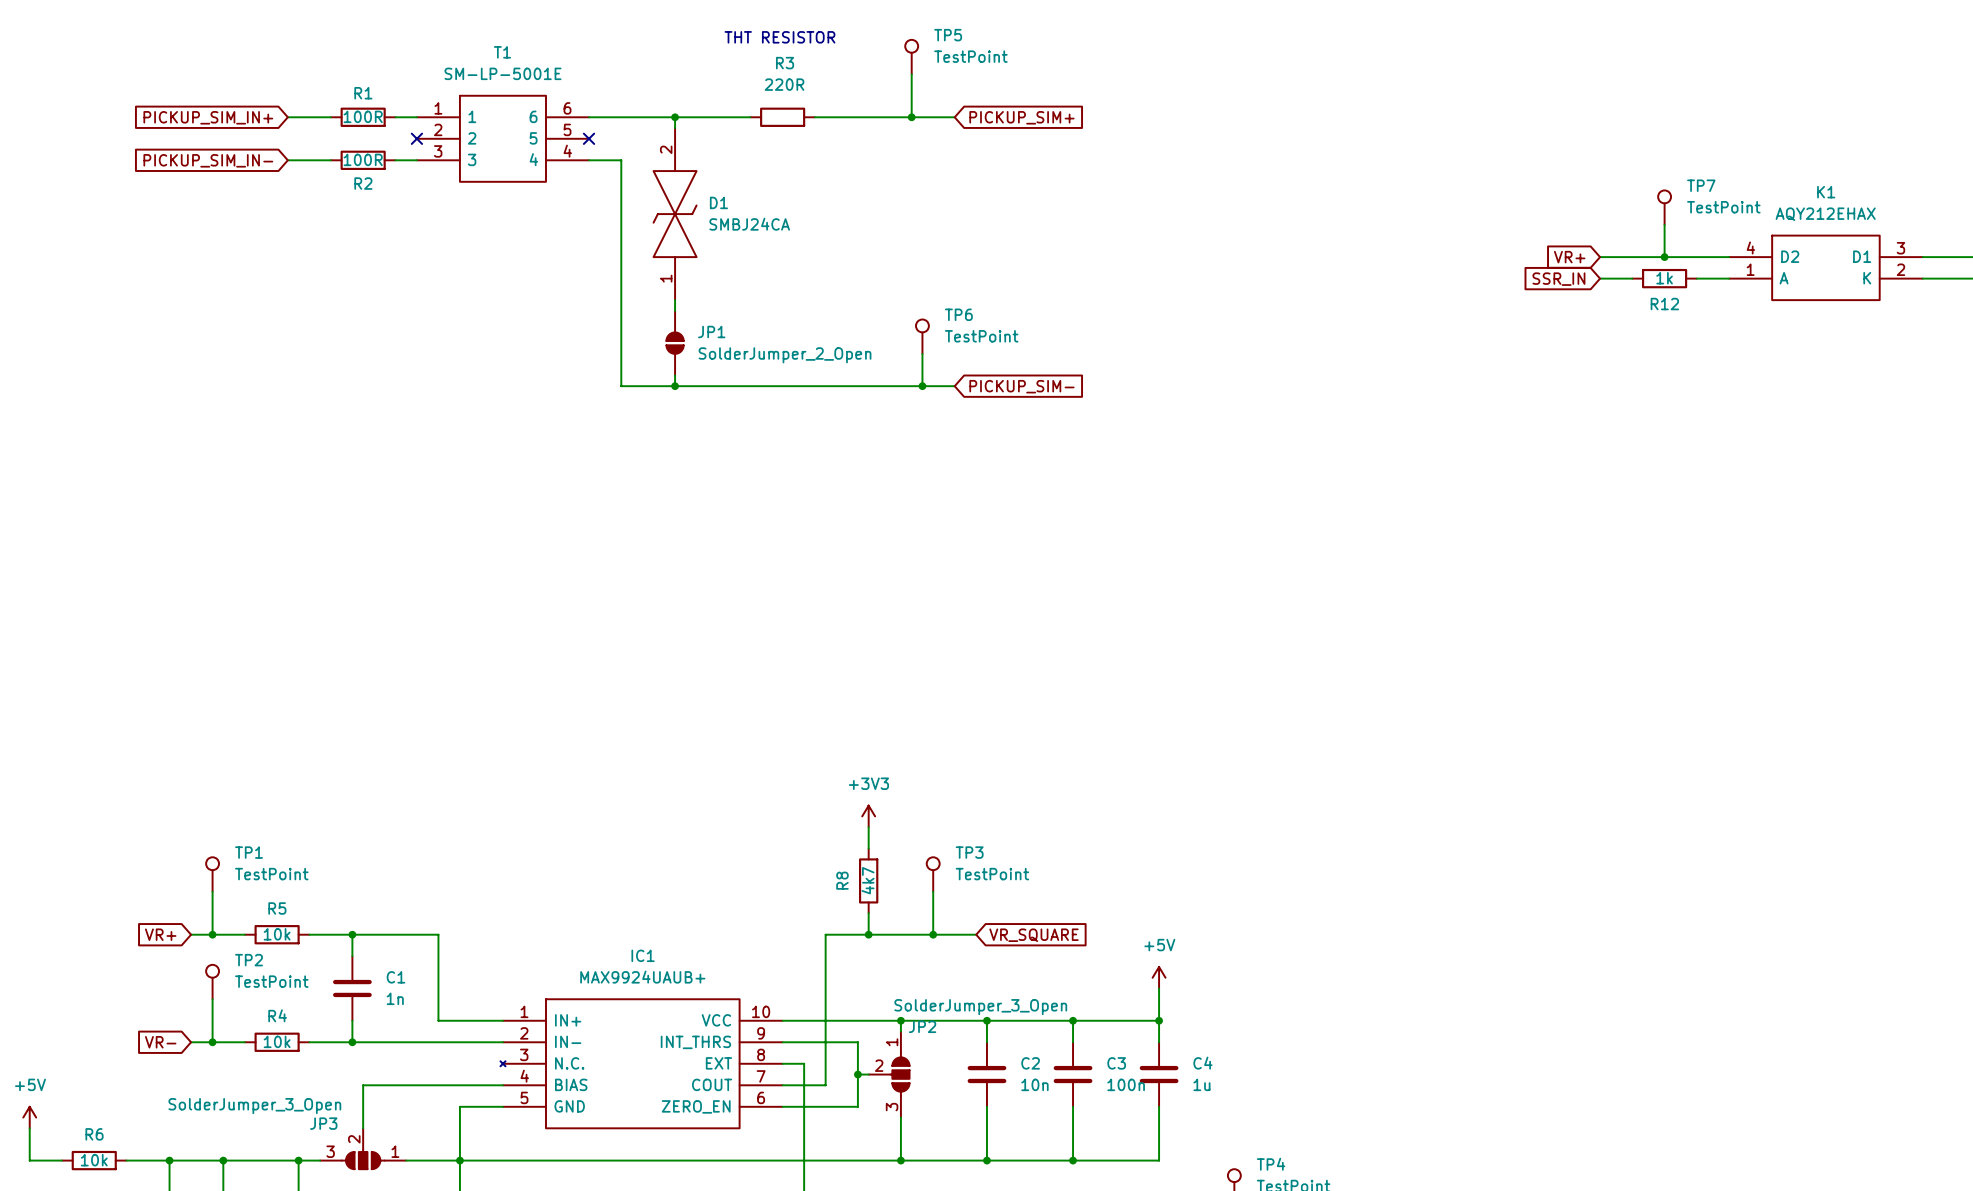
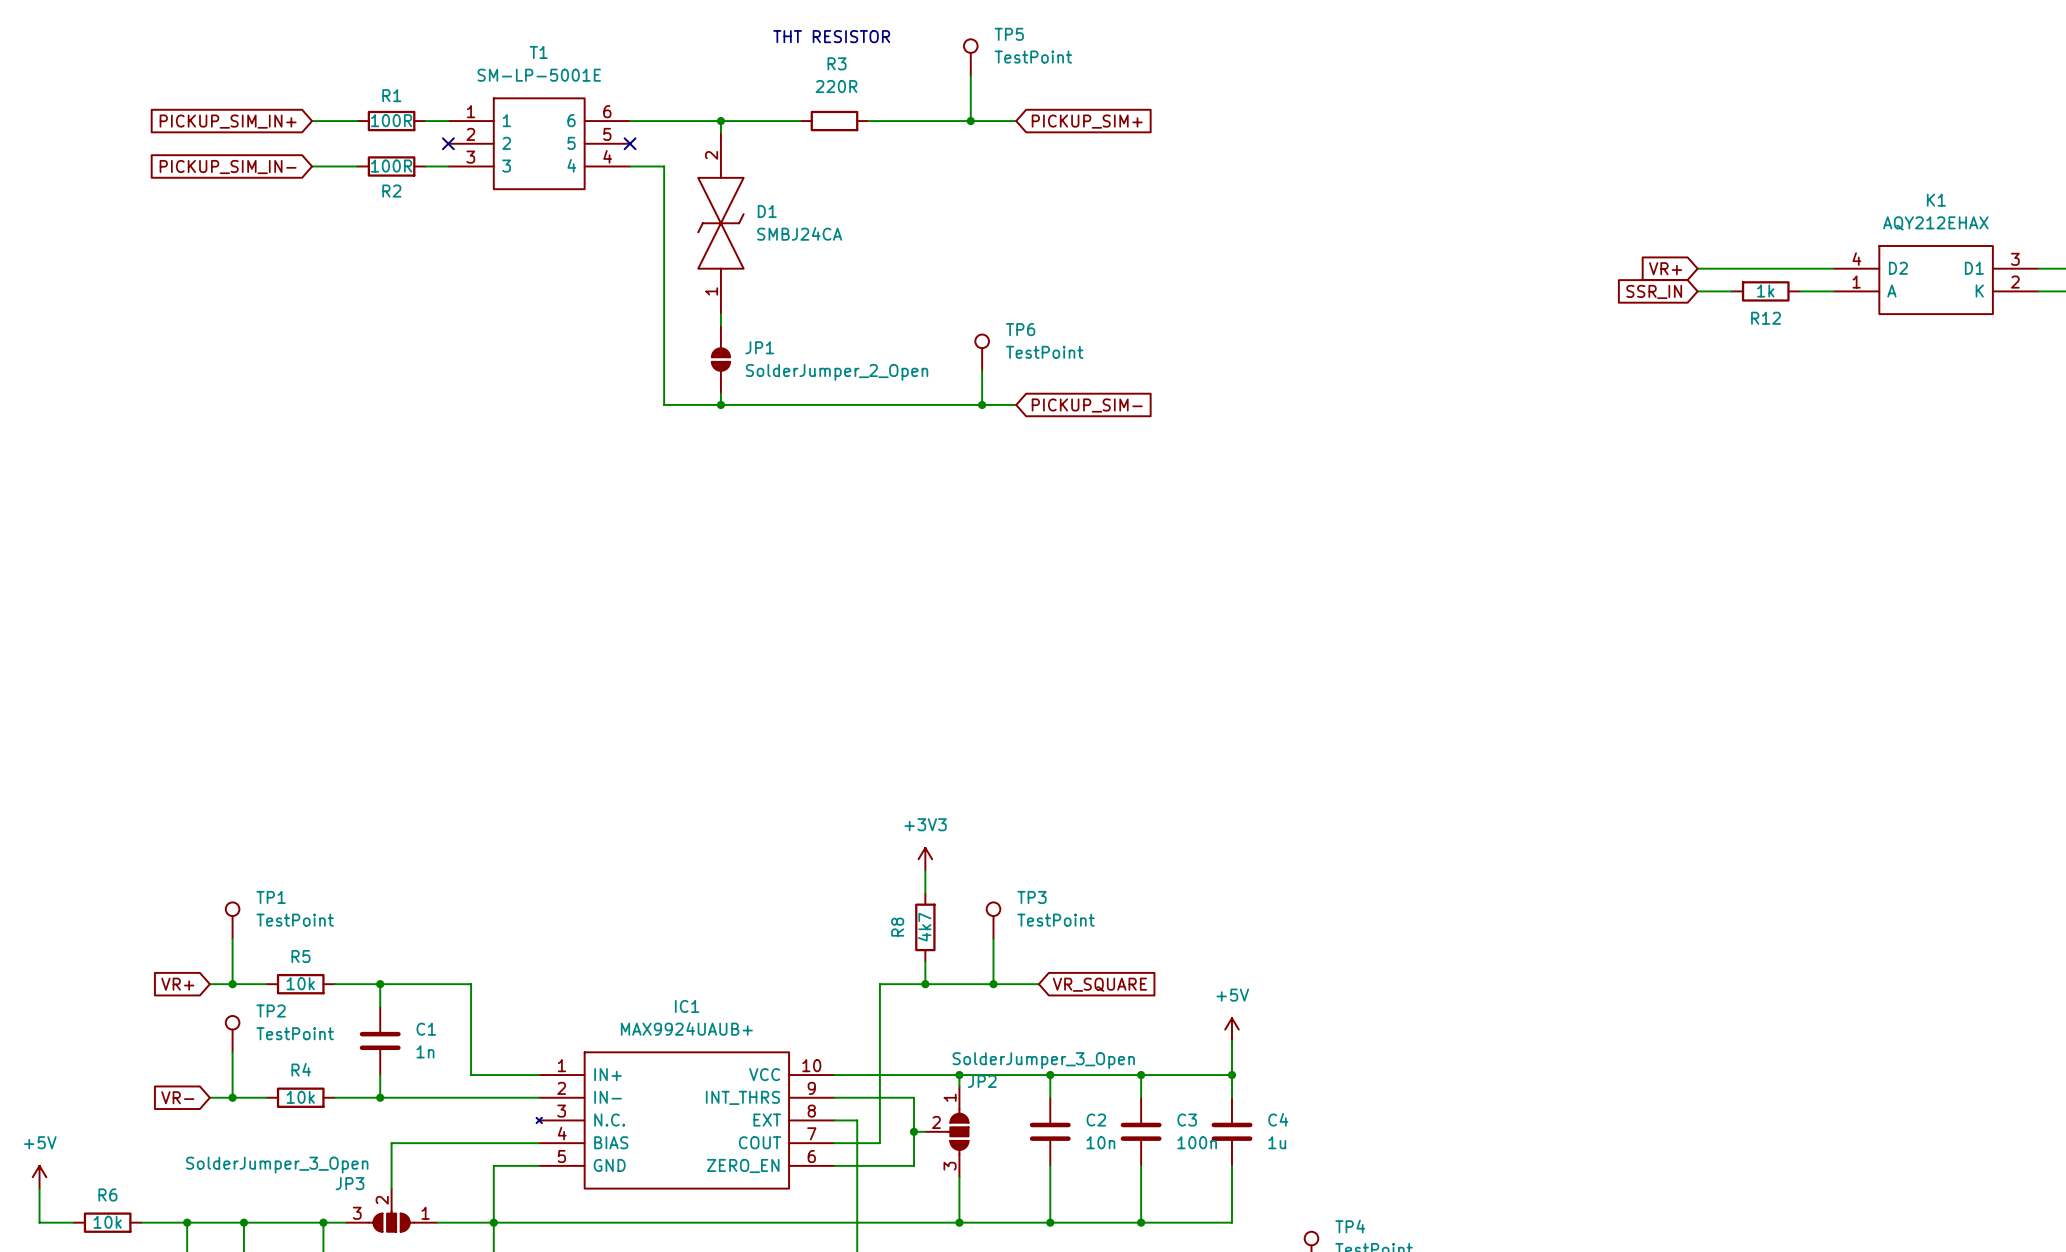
TP7: TestPoint (1664, 207) -> none
wire: (1664, 224) (1664, 257) -> none
junction: (1664, 257) -> none

